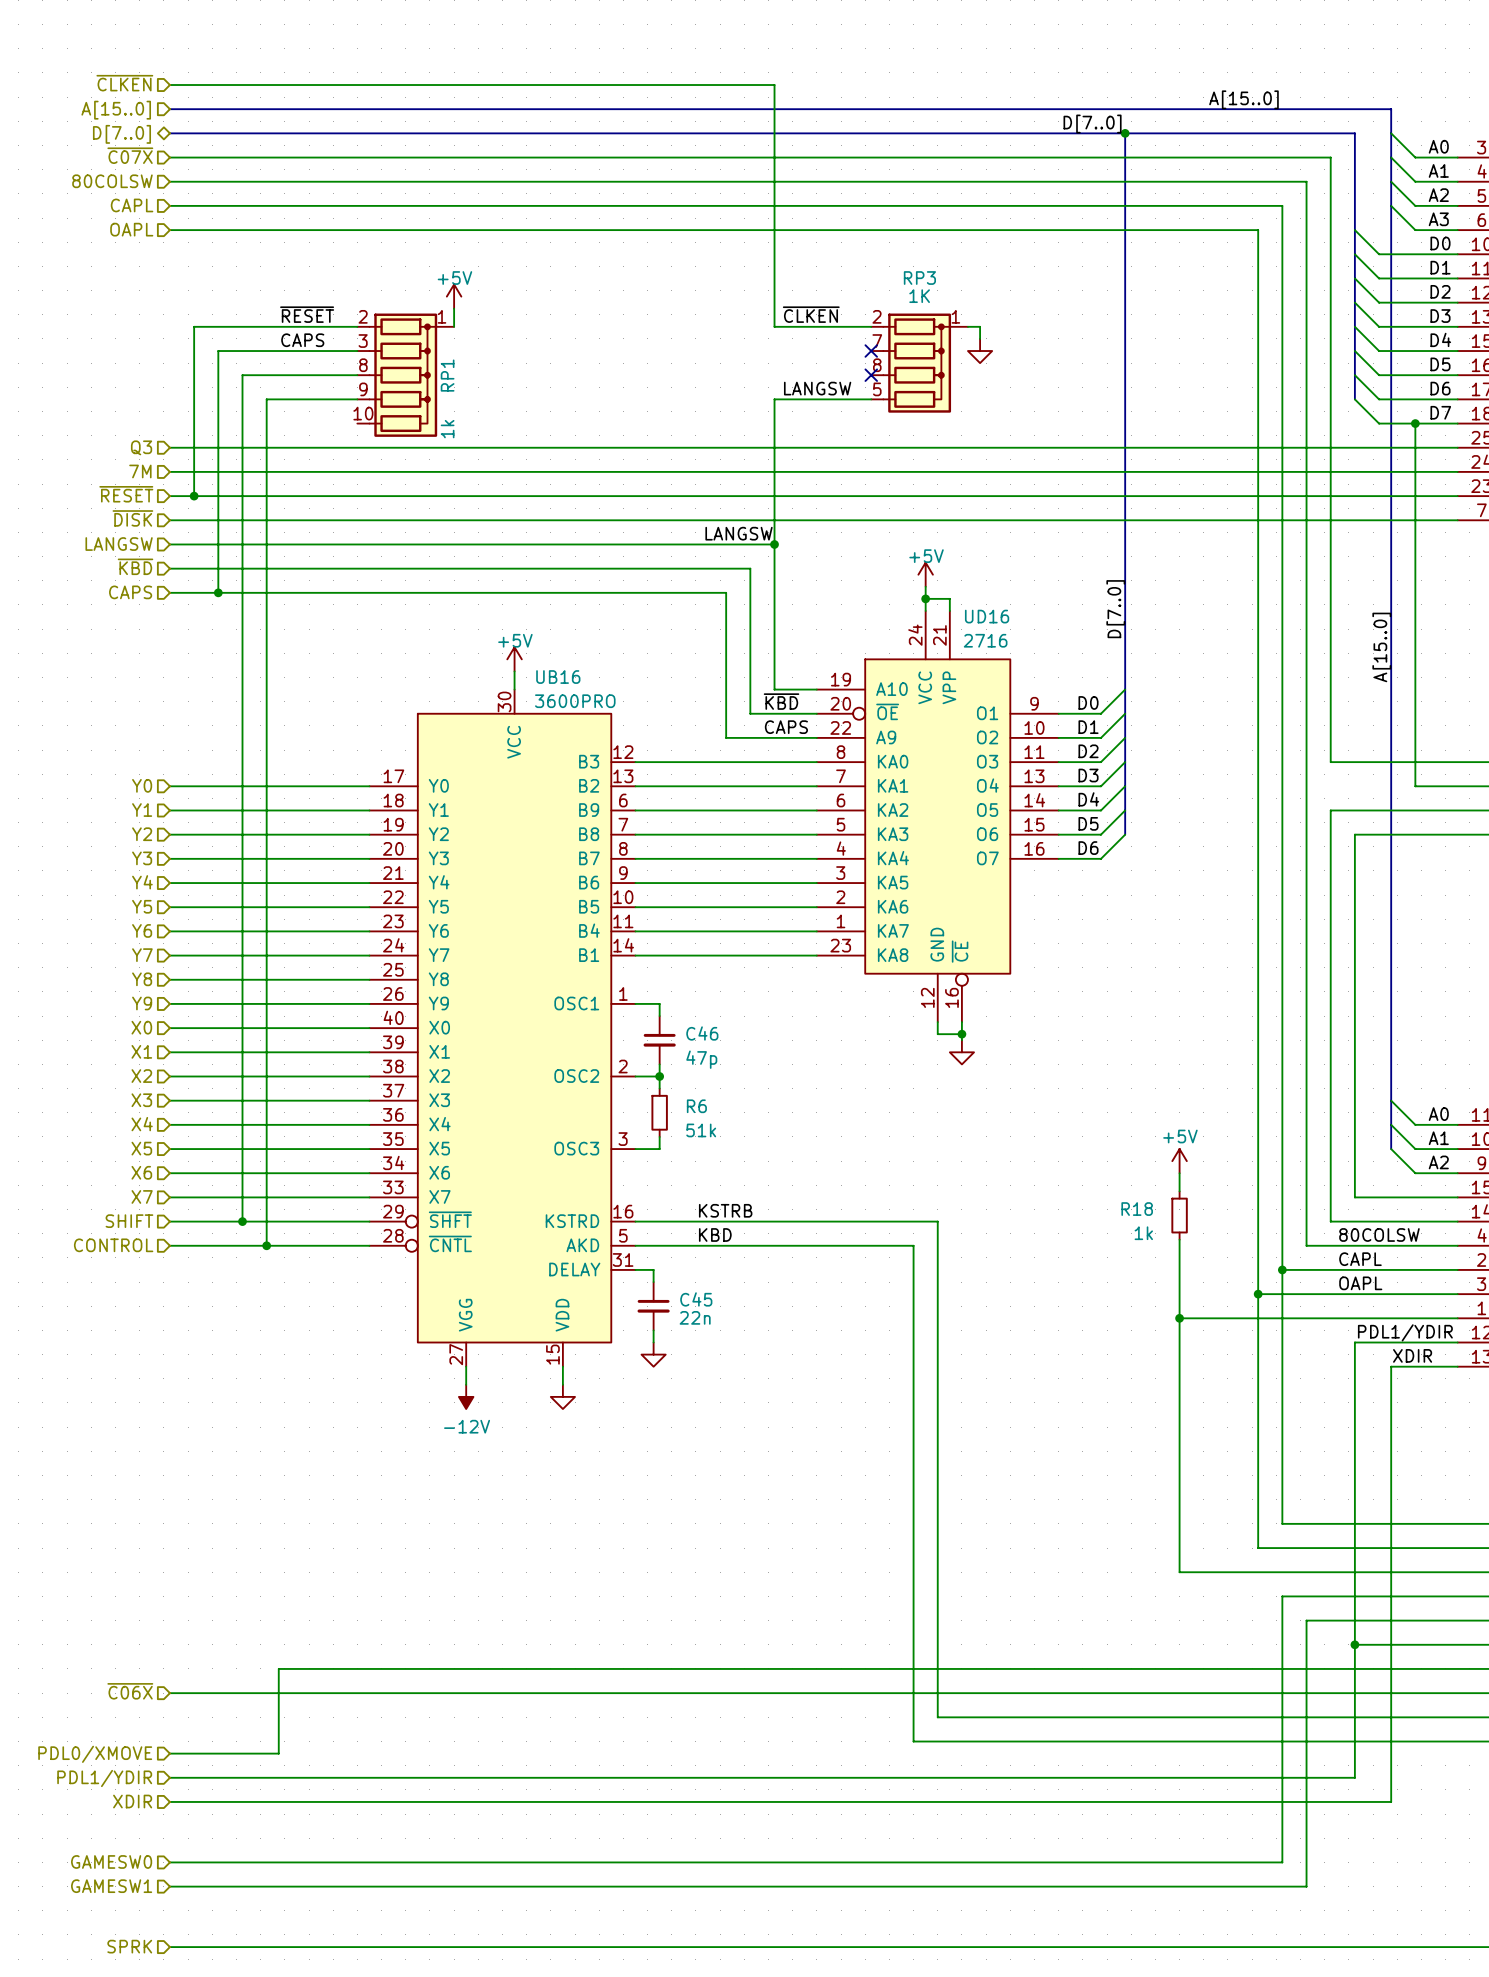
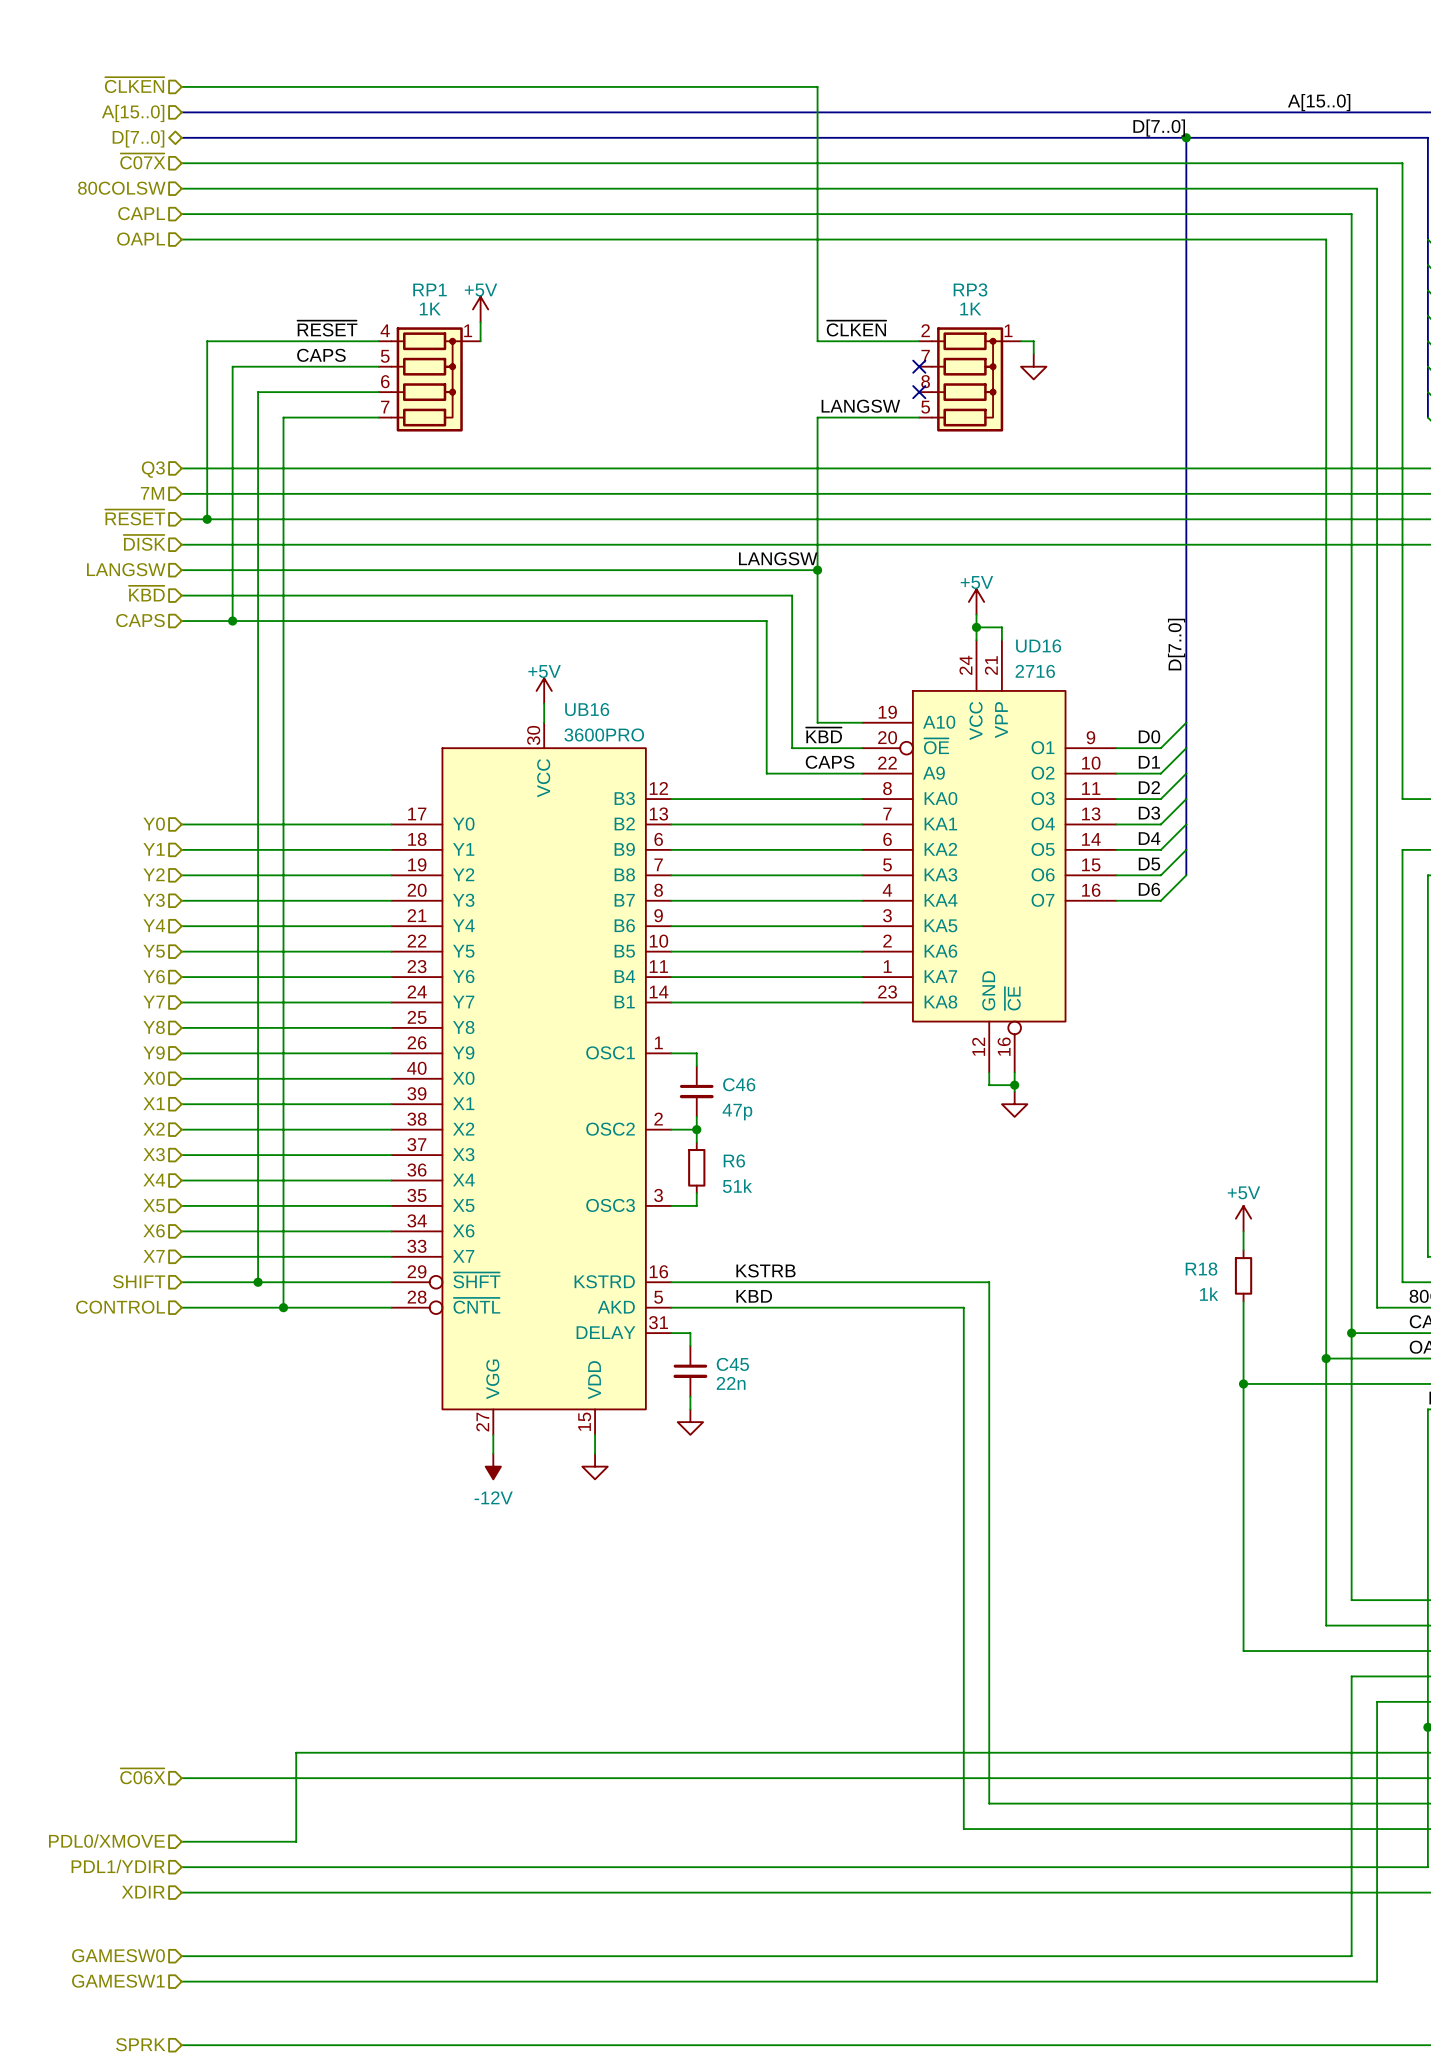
RP1 symbol: [357, 313, 455, 437] -> [378, 327, 481, 432]
RP1 name position: RP1 (447, 375) -> RP1 (430, 289)
RP1 value: 1k (447, 429) -> 1K (430, 309)

